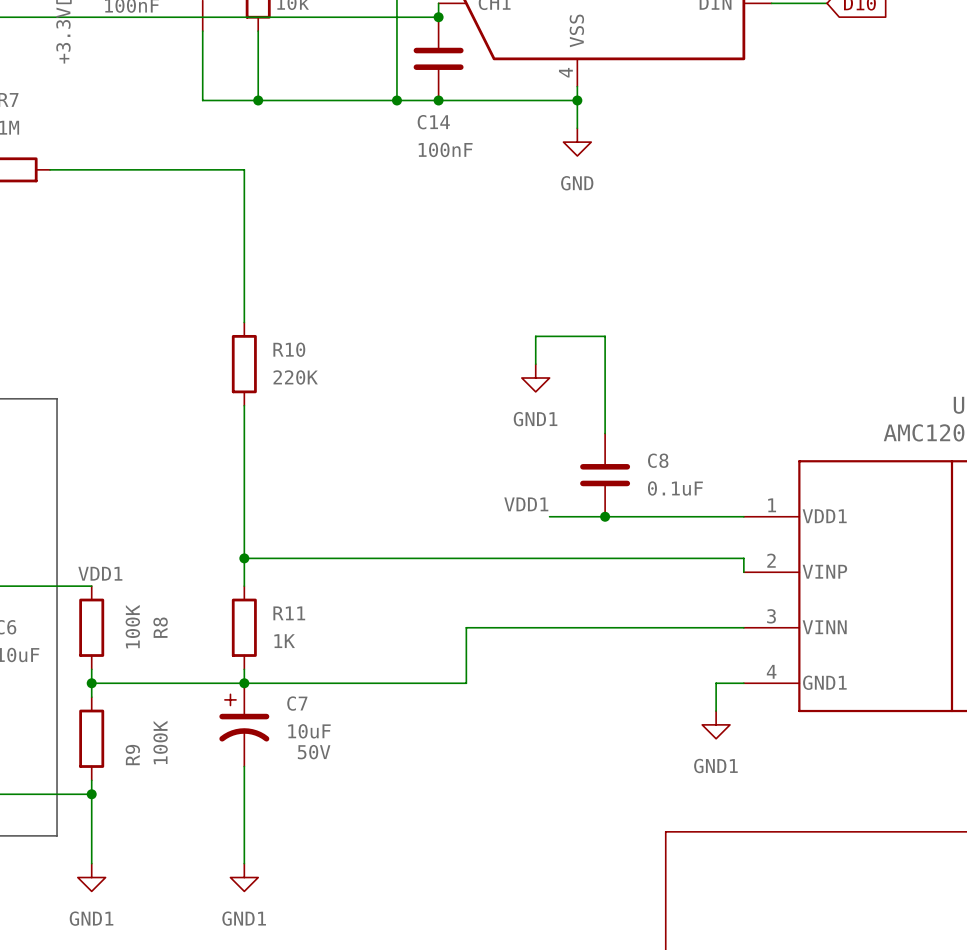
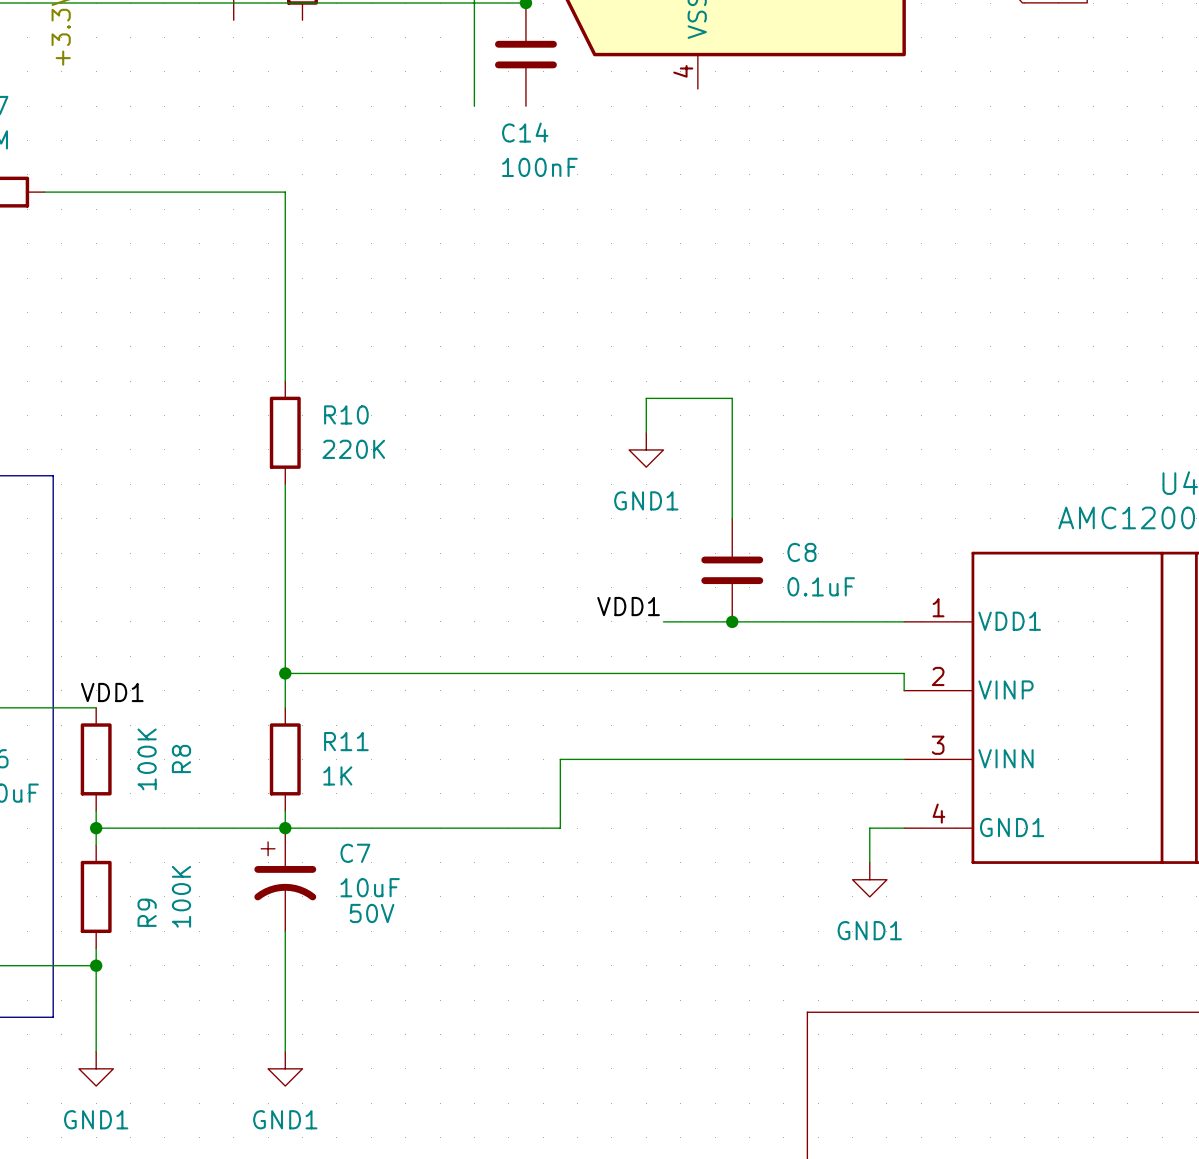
wire: (202, 31) (202, 100) (577, 100) -> none
wire: (258, 31) (258, 100) -> none
wire: (577, 86) (577, 128) -> none
junction: (258, 100) -> none
junction: (396, 100) -> none
junction: (438, 100) -> none
junction: (577, 100) -> none
power symbol: GND (577, 142) -> none

